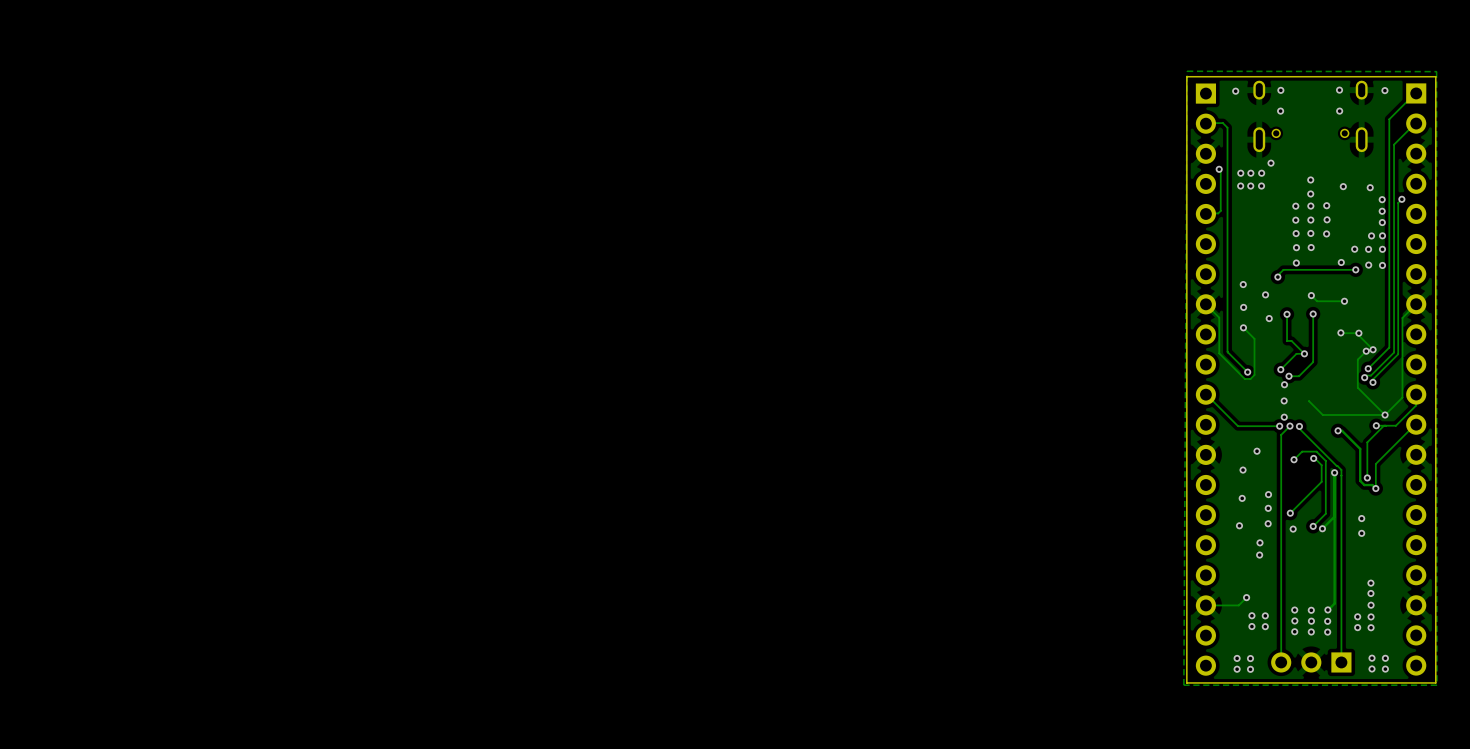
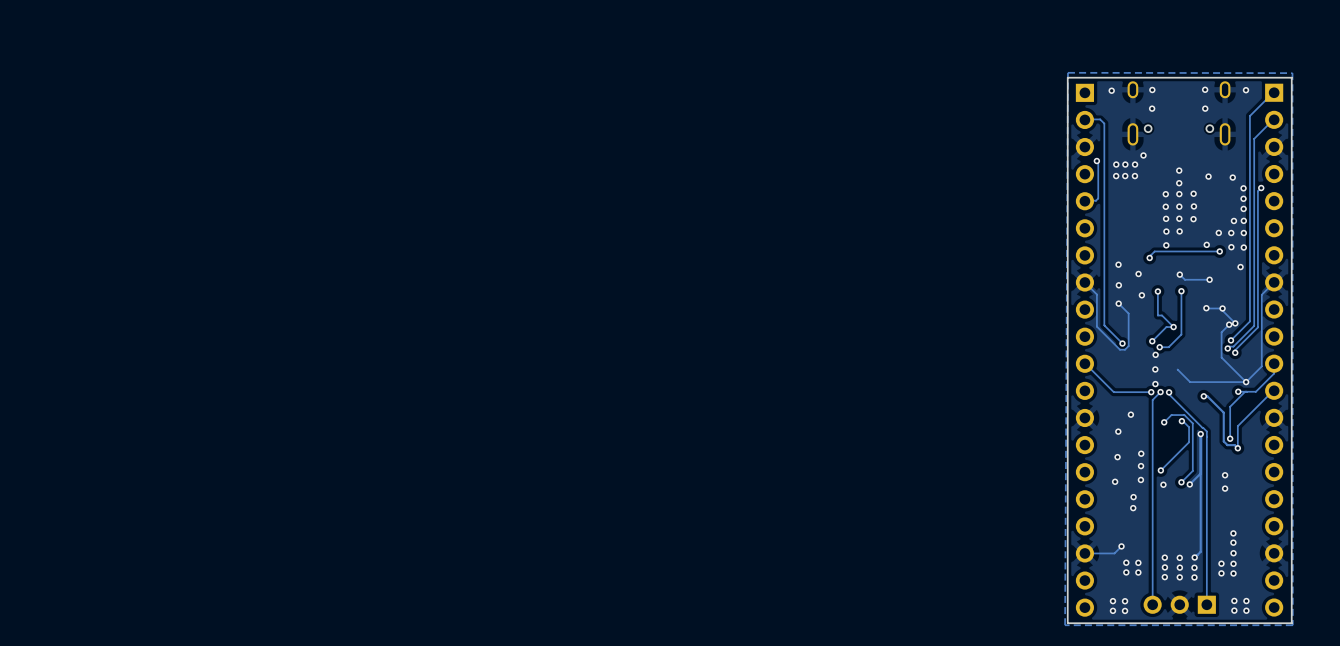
via: none -> (1240, 267)

